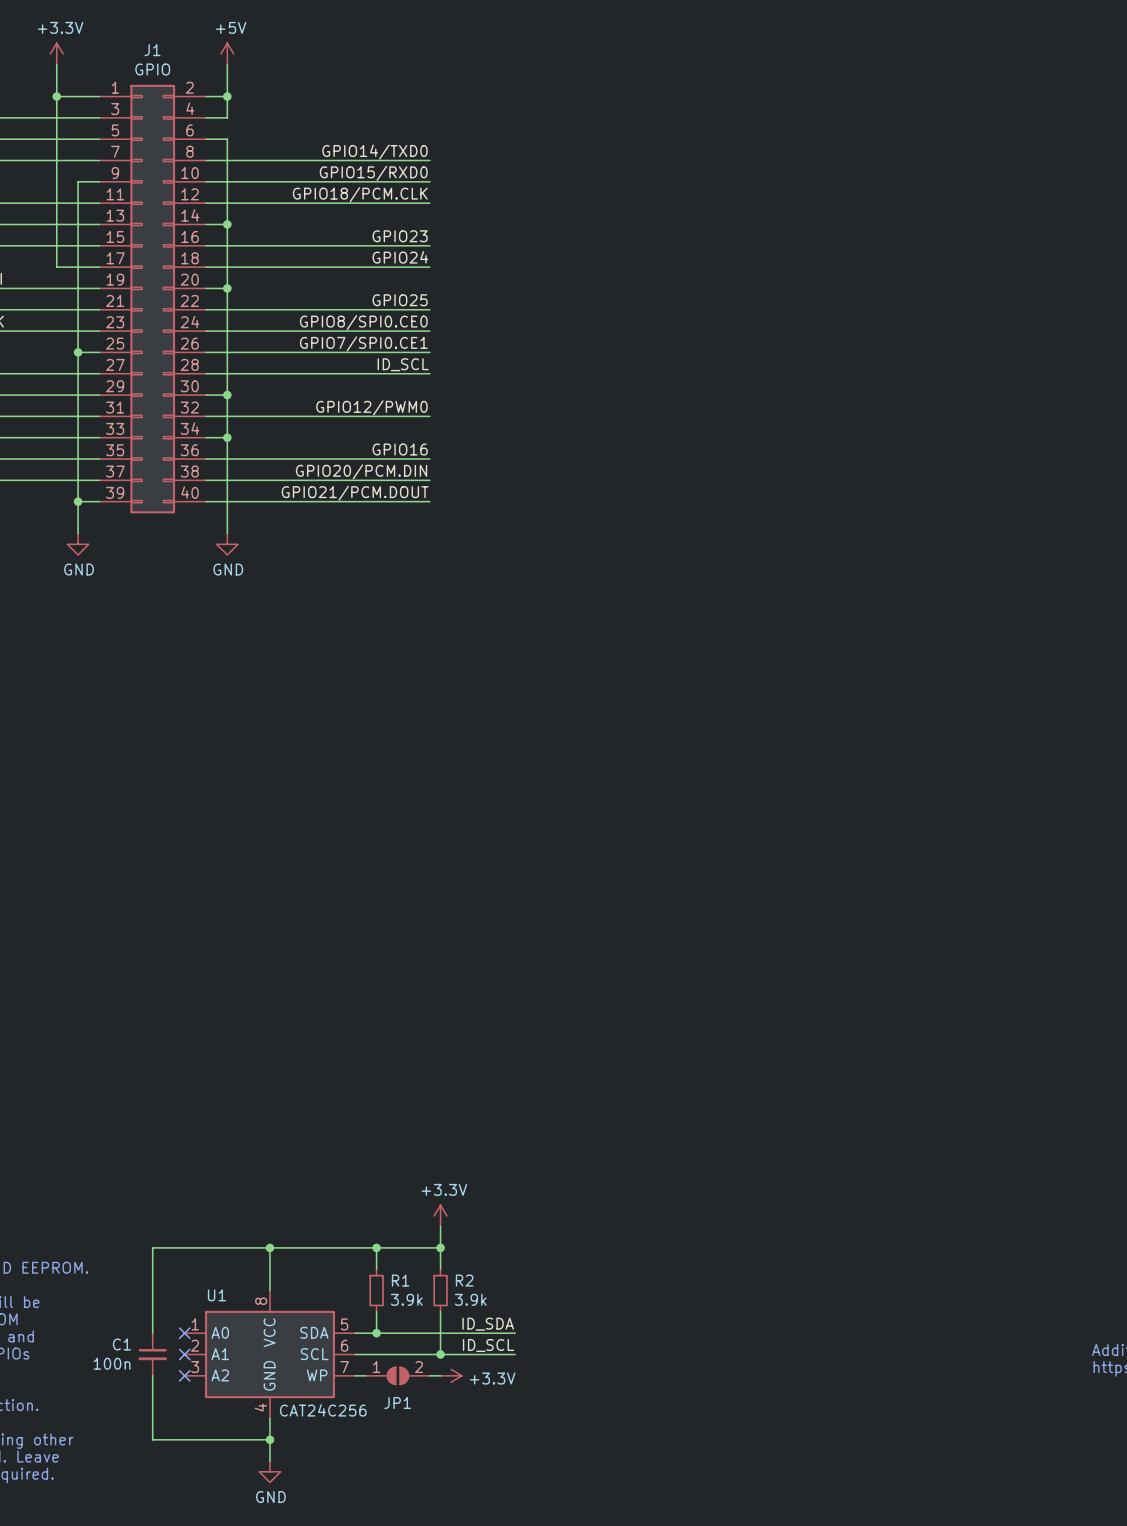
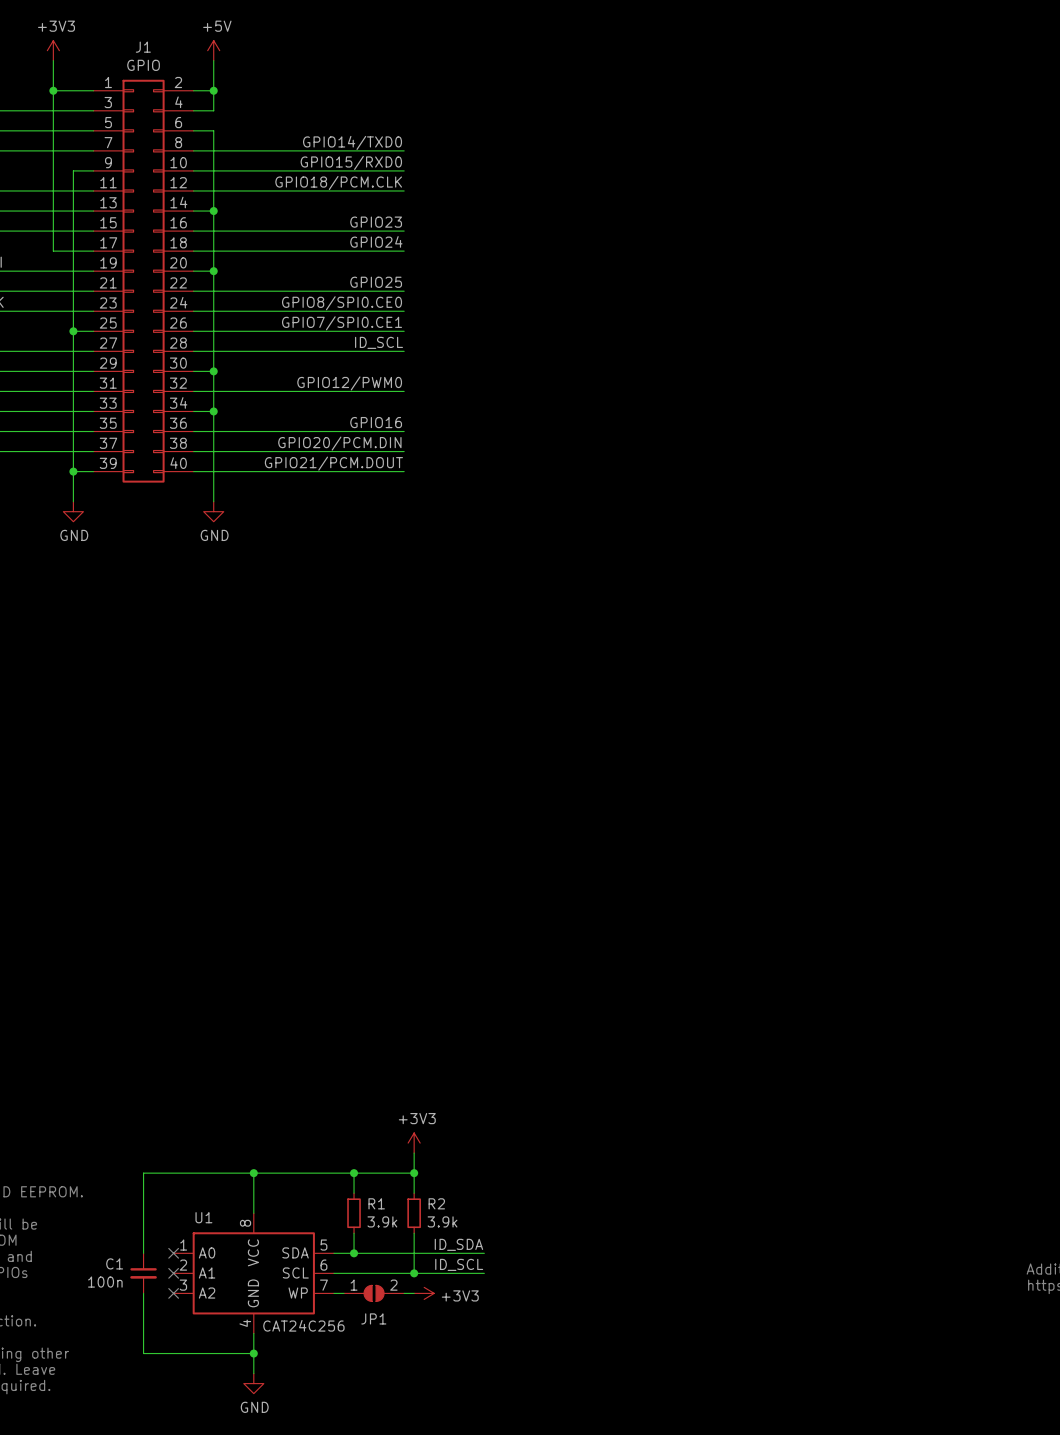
power symbol: +3.3V (56, 53) -> +3V3 (53, 50)
power symbol: +3.3V (440, 1215) -> +3V3 (414, 1143)
power symbol: +3.3V (451, 1375) -> +3V3 (424, 1293)

